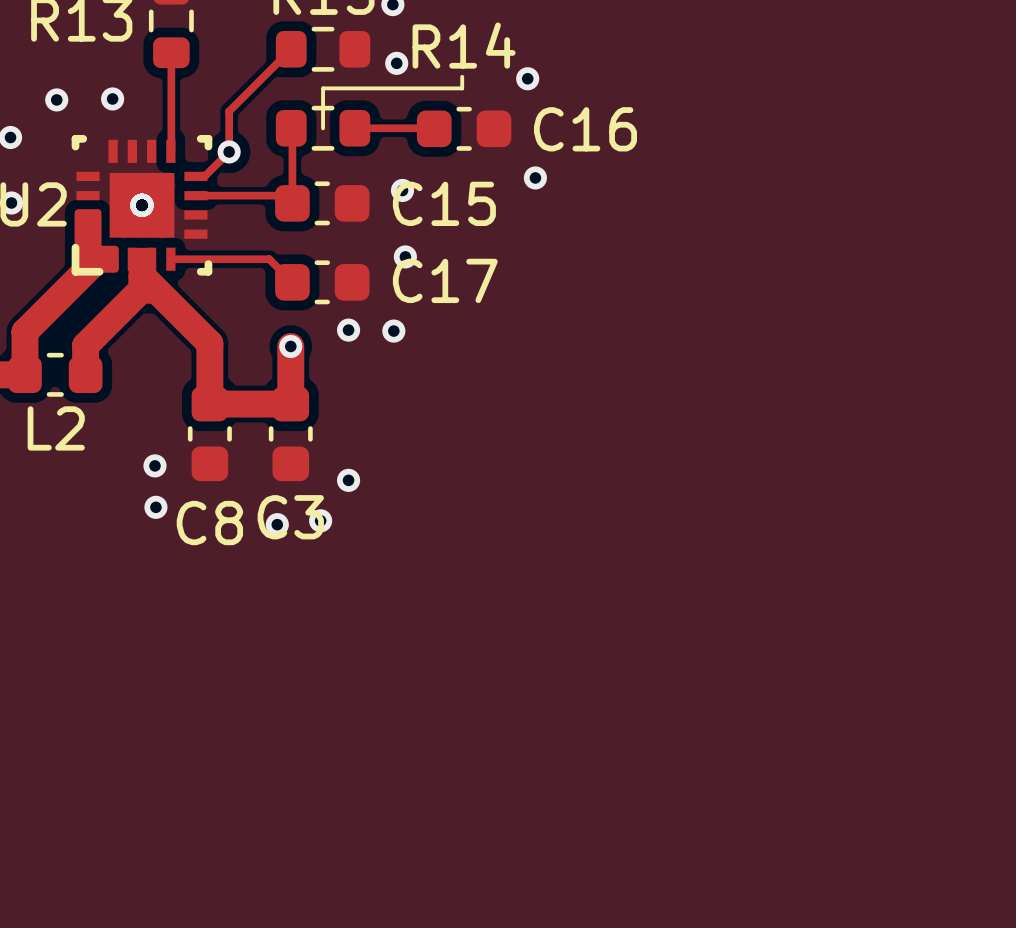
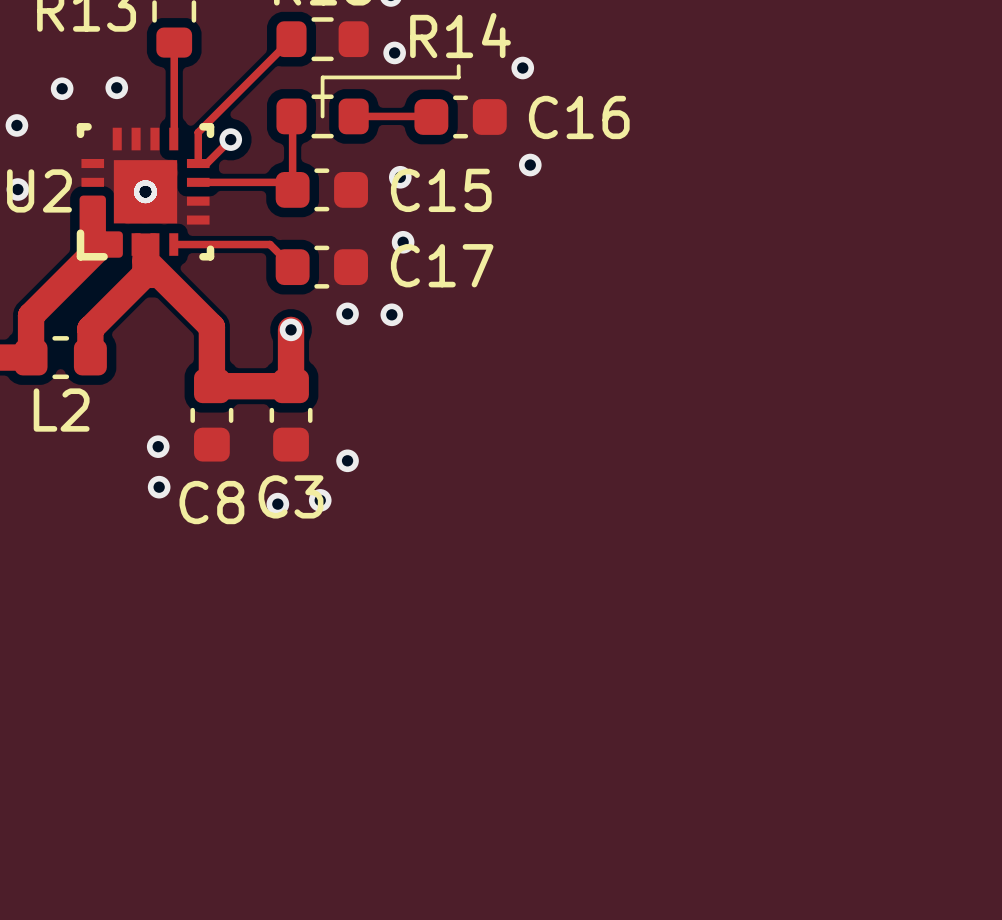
track: (229, 111) (229, 151) -> (230, 99) (198, 132) (198, 163)

